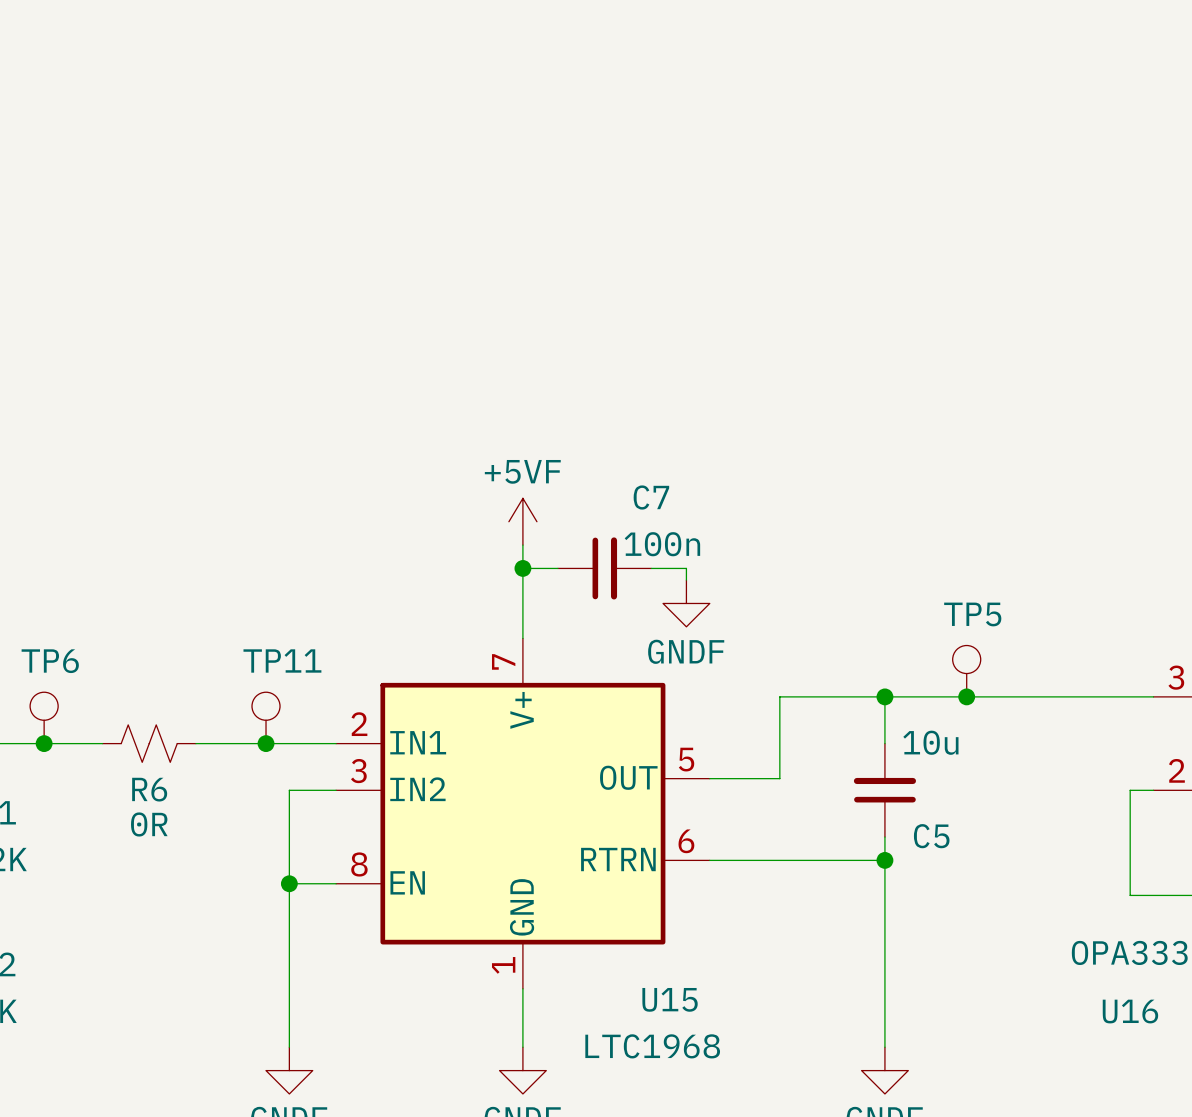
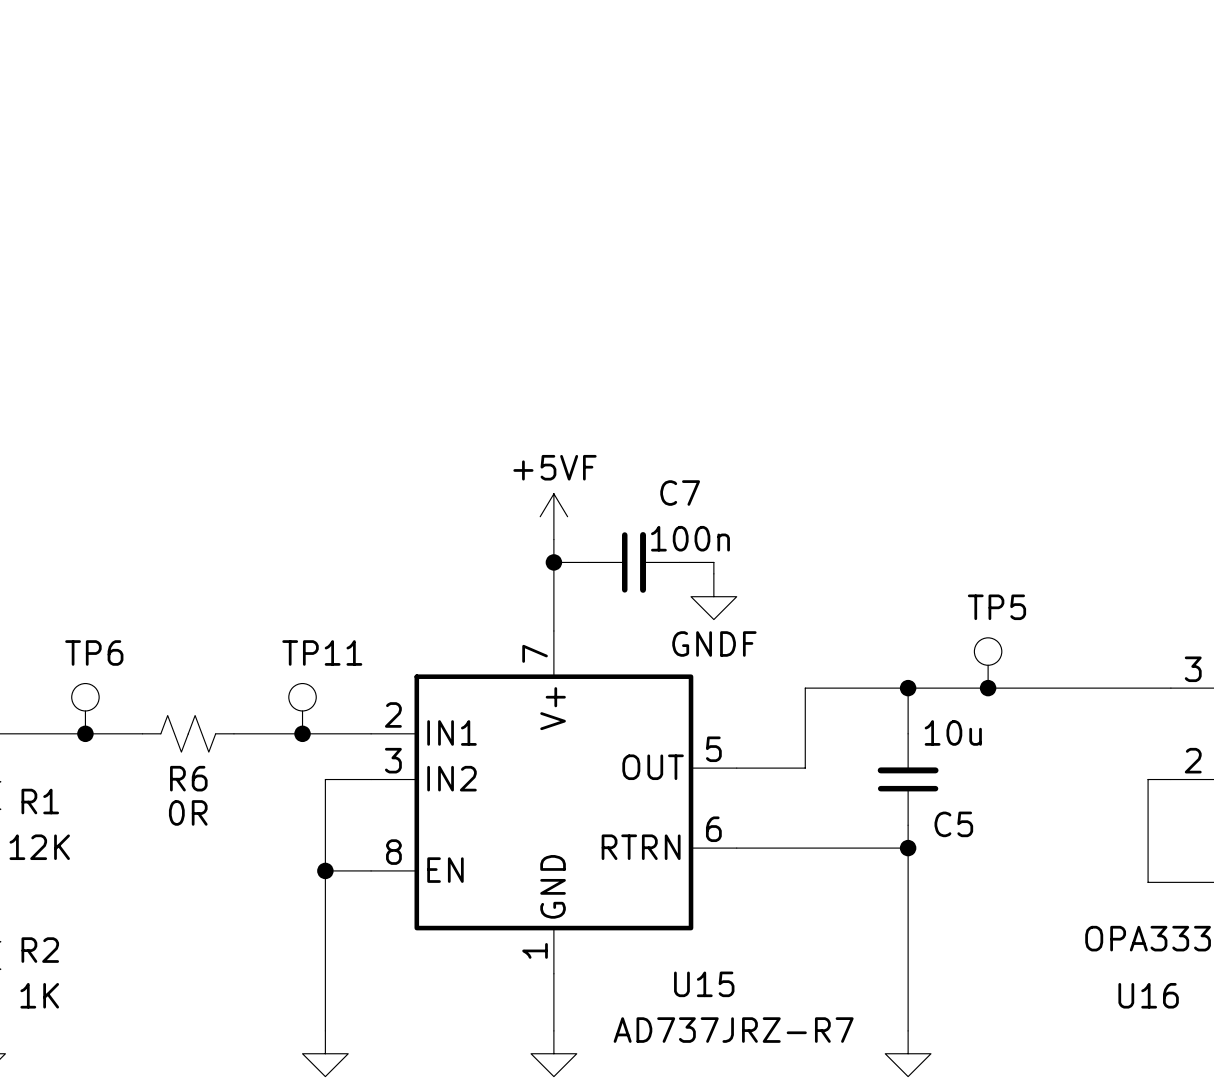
U15 value: LTC1968 (652, 1046) -> AD737JRZ-R7 (733, 1030)

